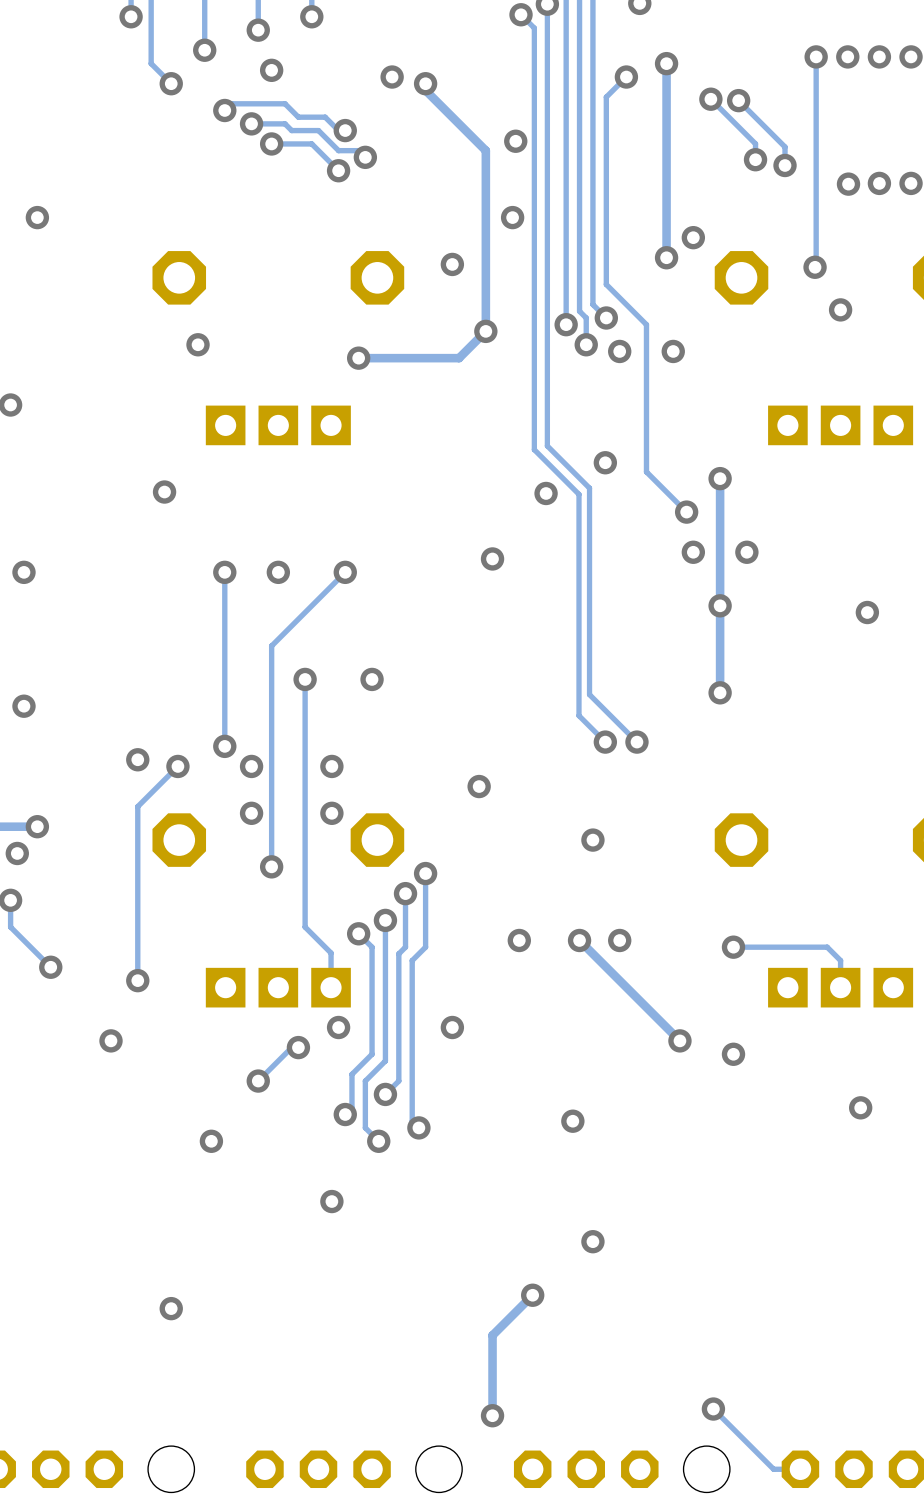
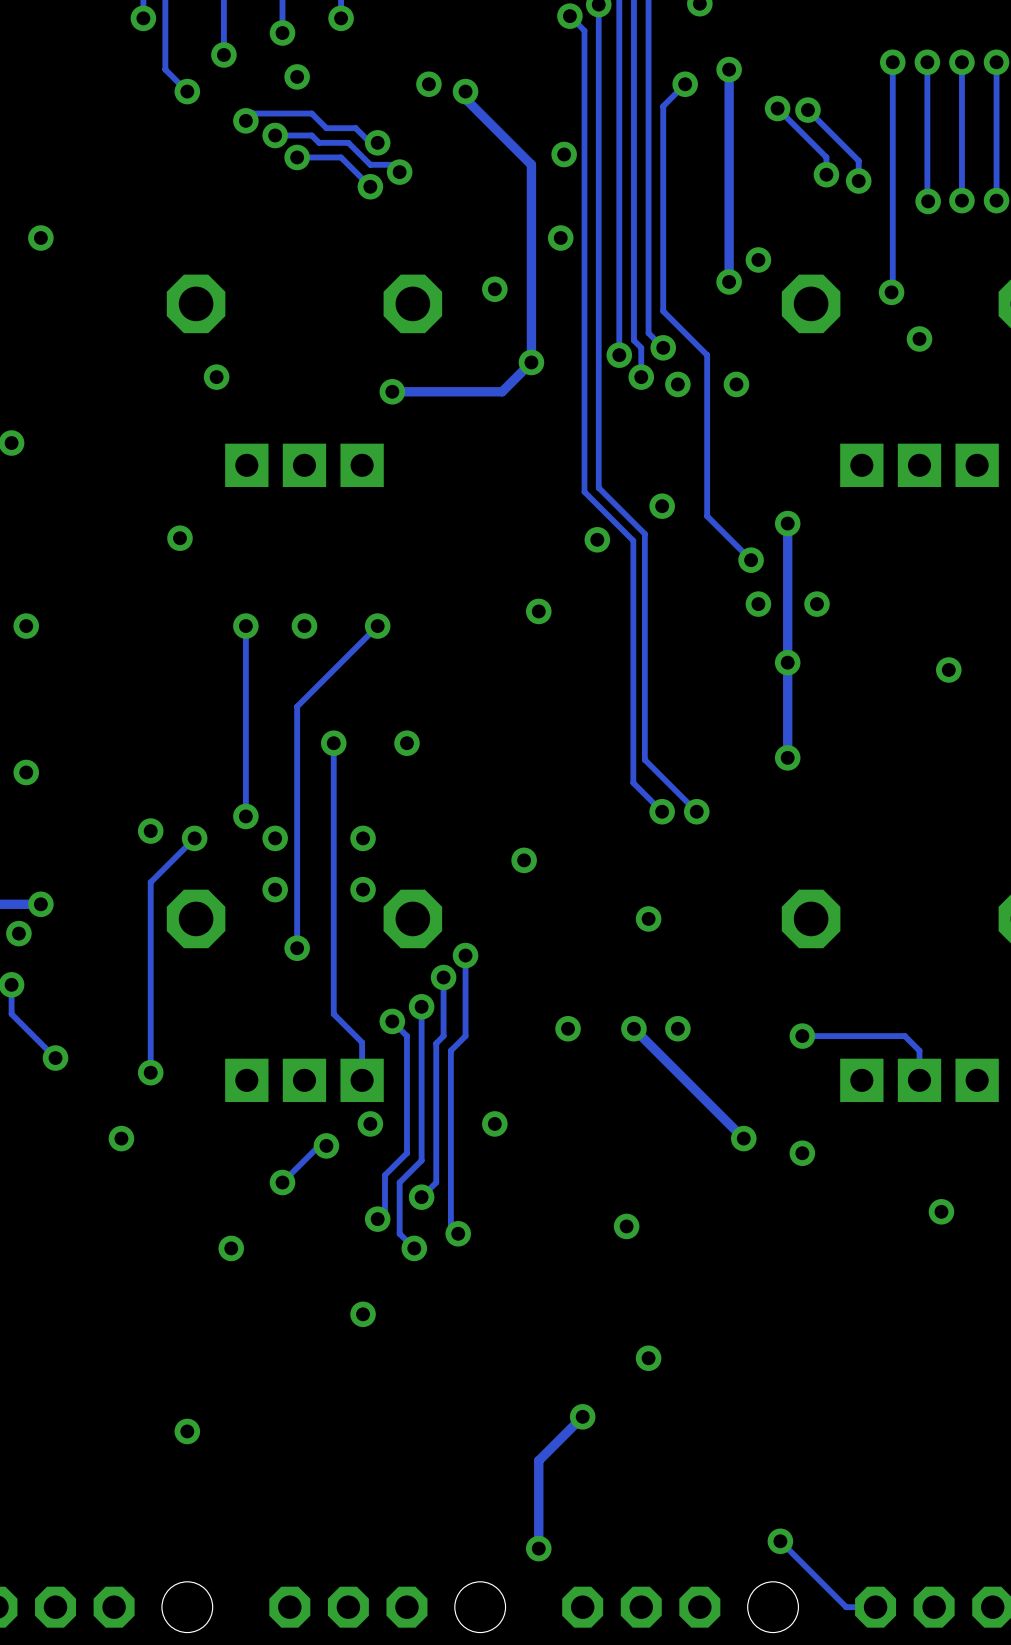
track: none -> (927, 62) (928, 201)
track: none -> (961, 62) (961, 200)
track: none -> (996, 62) (996, 200)

